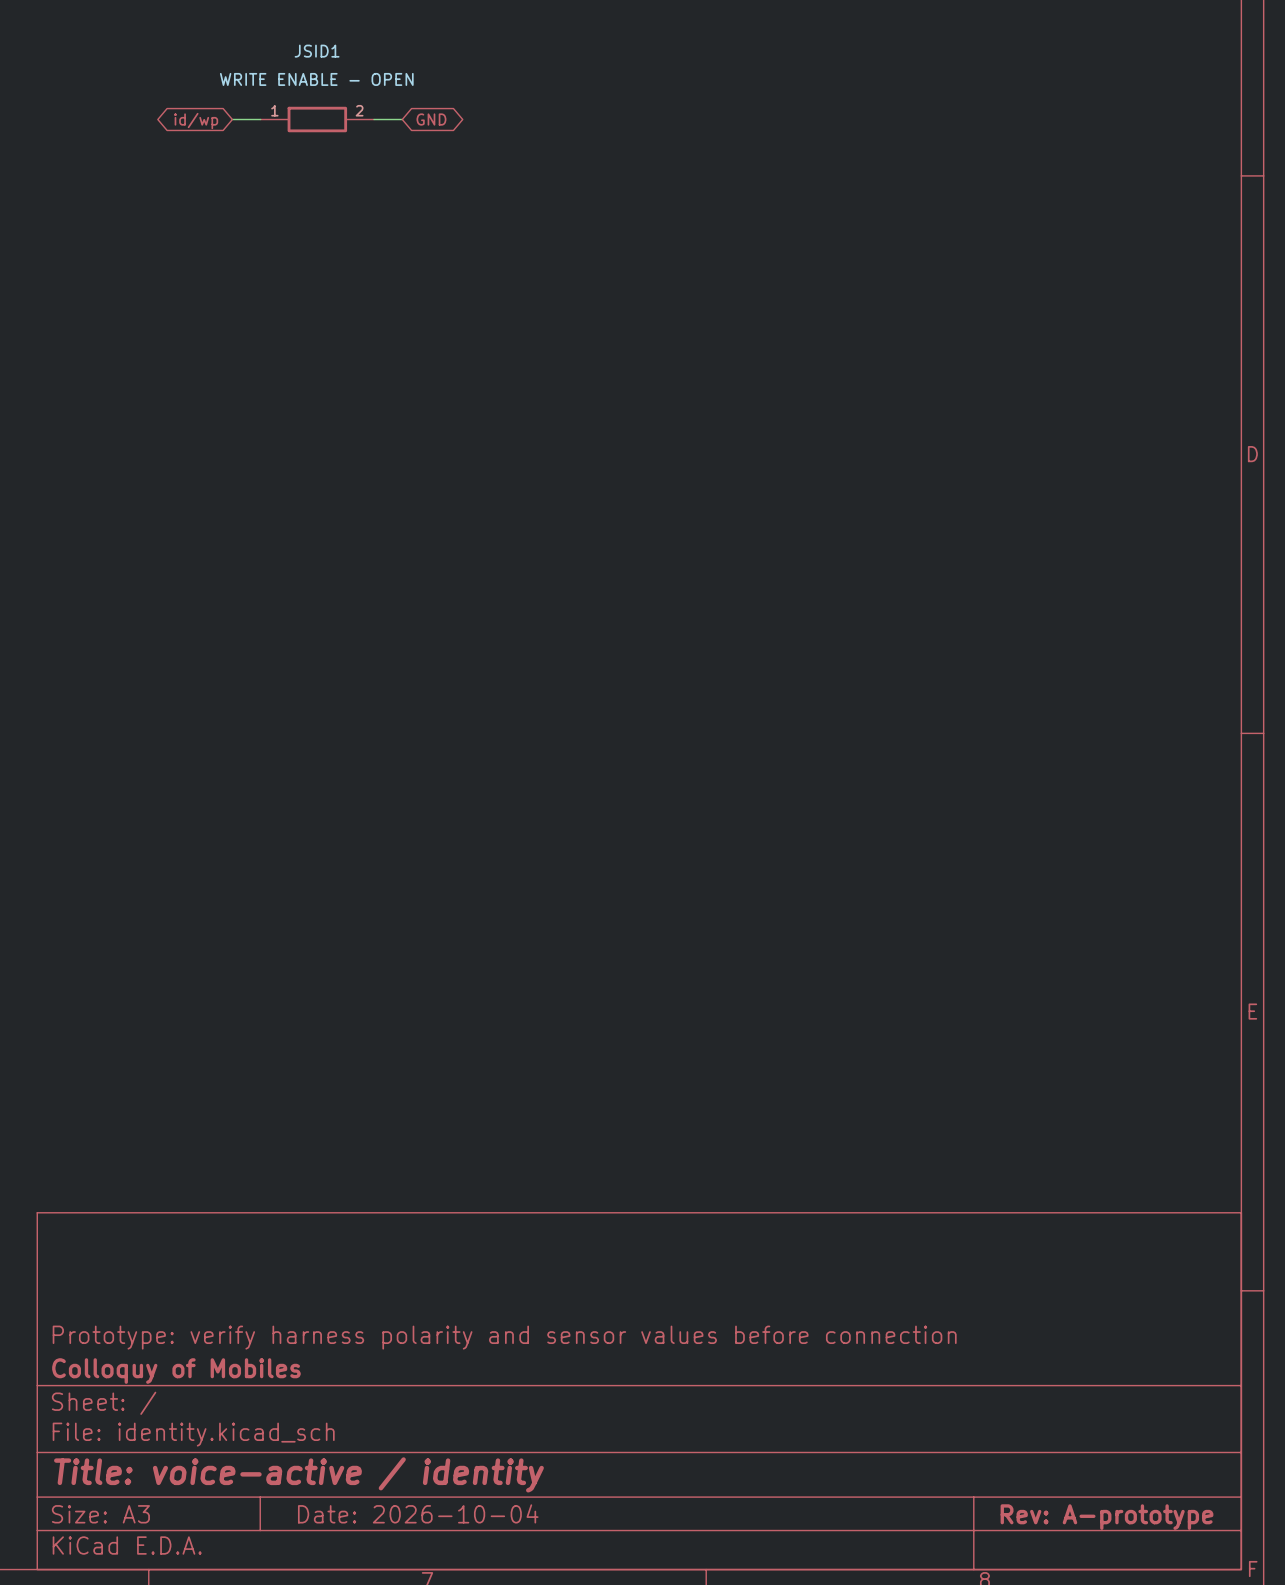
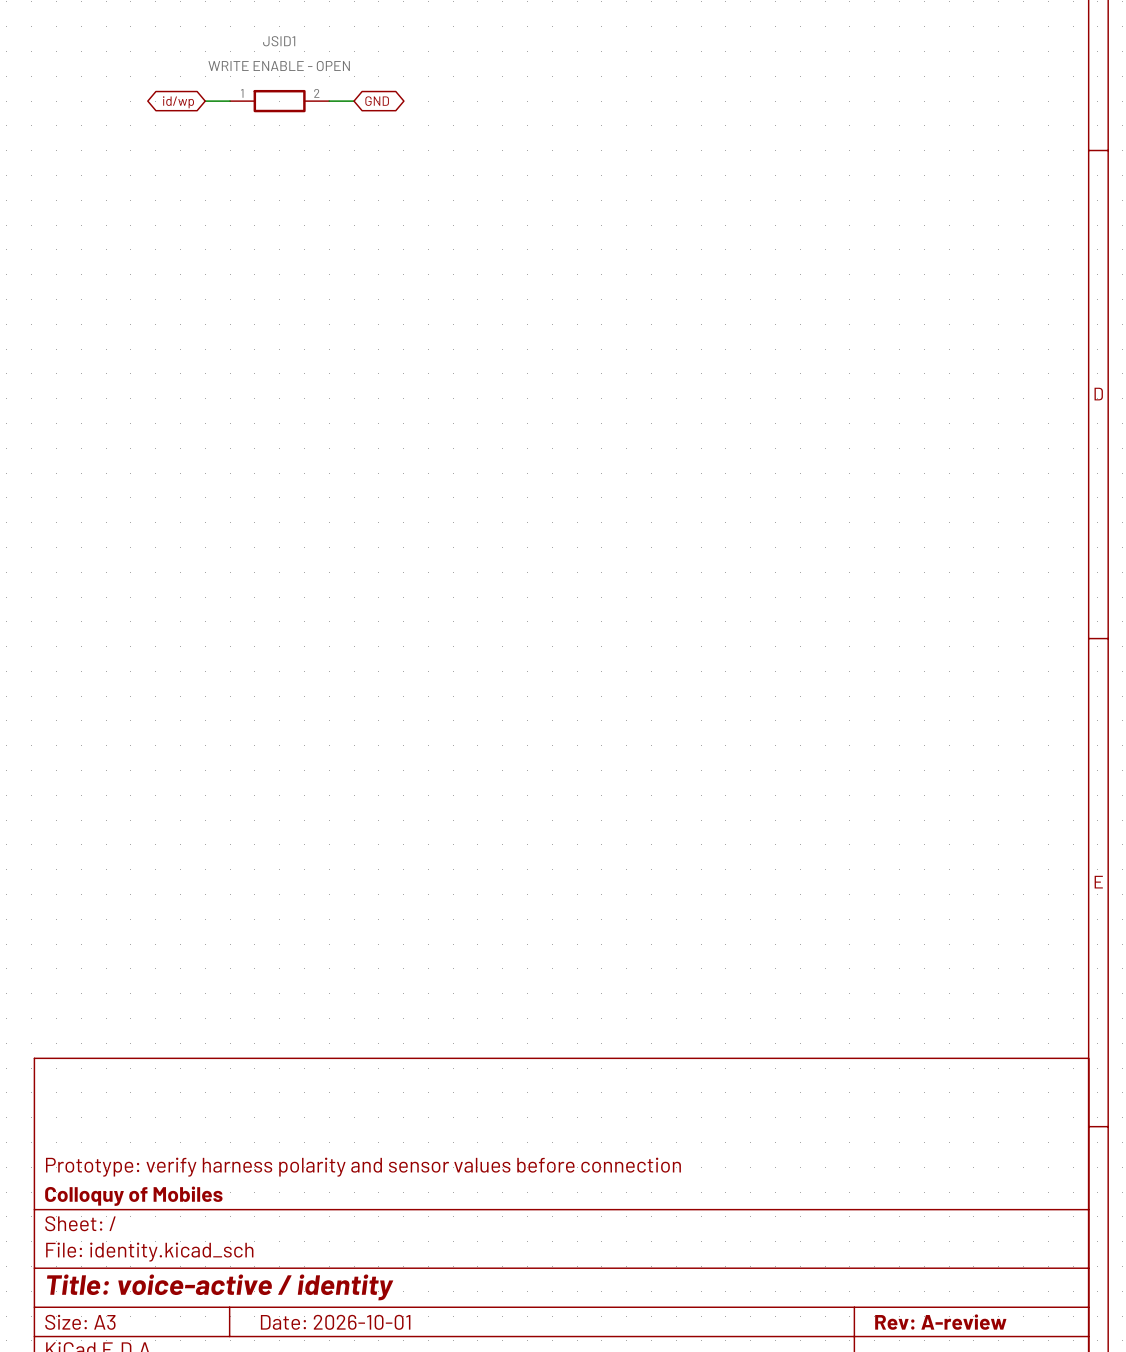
title block: Date: 2026-10-04 (418, 1513) -> Date: 2026-10-01 (335, 1322)
title block: Rev: A-prototype (1106, 1517) -> Rev: A-review (940, 1322)

